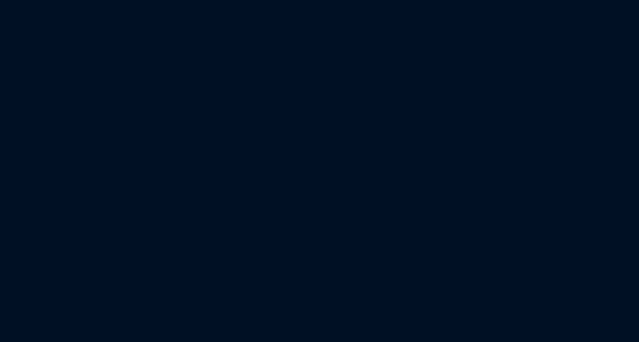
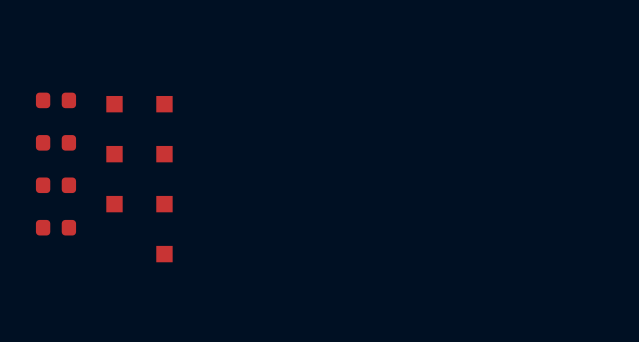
part: none -> (56, 100)
part: none -> (114, 104)
part: none -> (164, 104)
part: none -> (56, 142)
part: none -> (114, 154)
part: none -> (164, 154)
part: none -> (56, 185)
part: none -> (114, 204)
part: none -> (164, 204)
part: none -> (56, 227)
part: none -> (164, 254)

